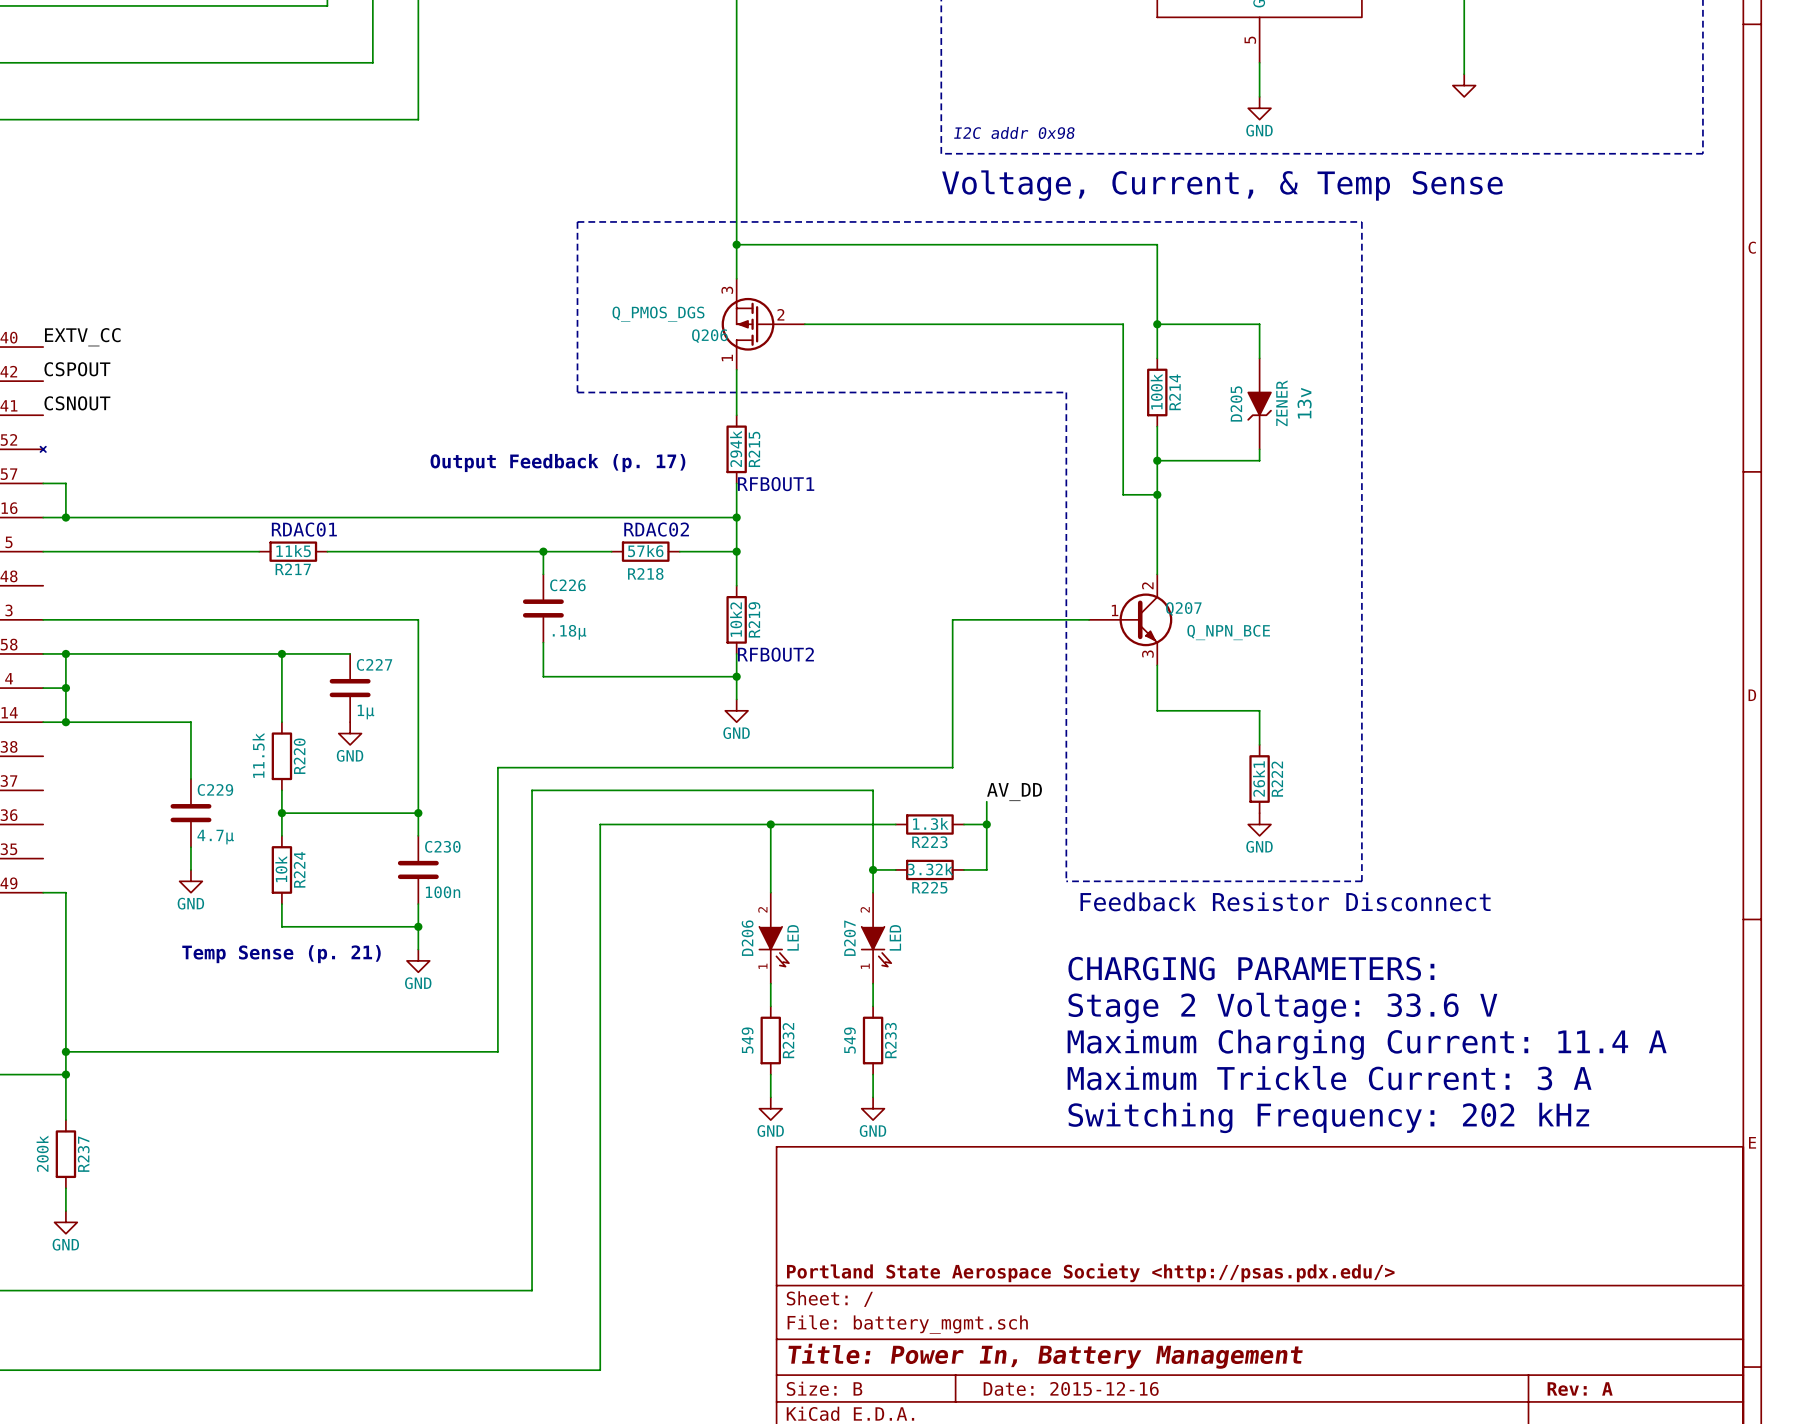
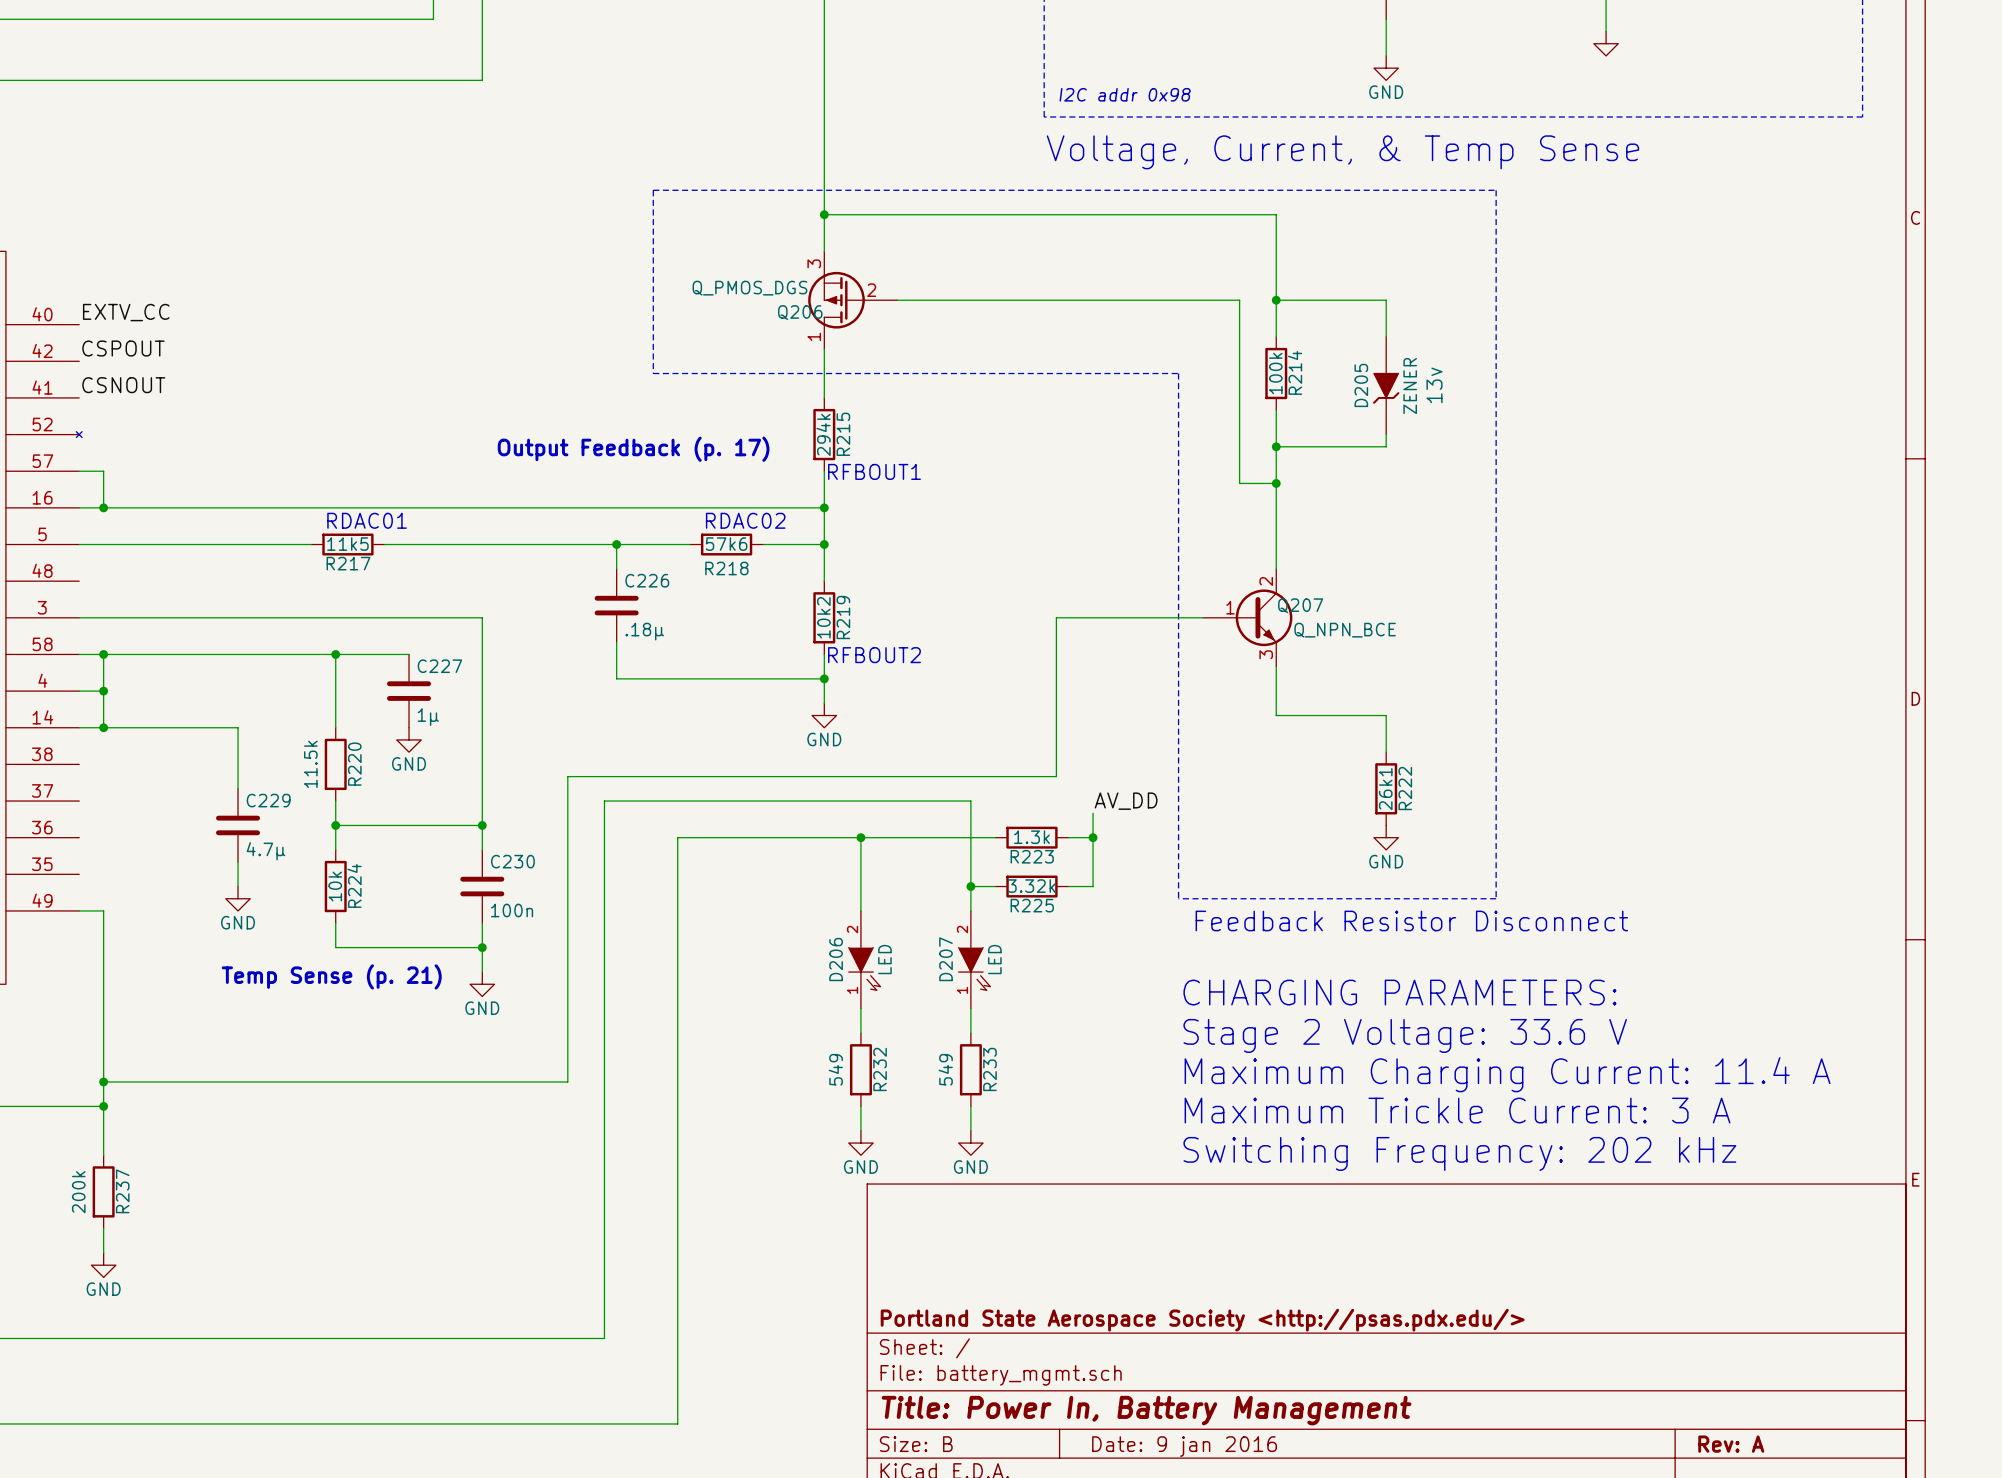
title block: Date: 2015-12-16 (1071, 1388) -> Date: 9 jan 2016 (1184, 1446)

